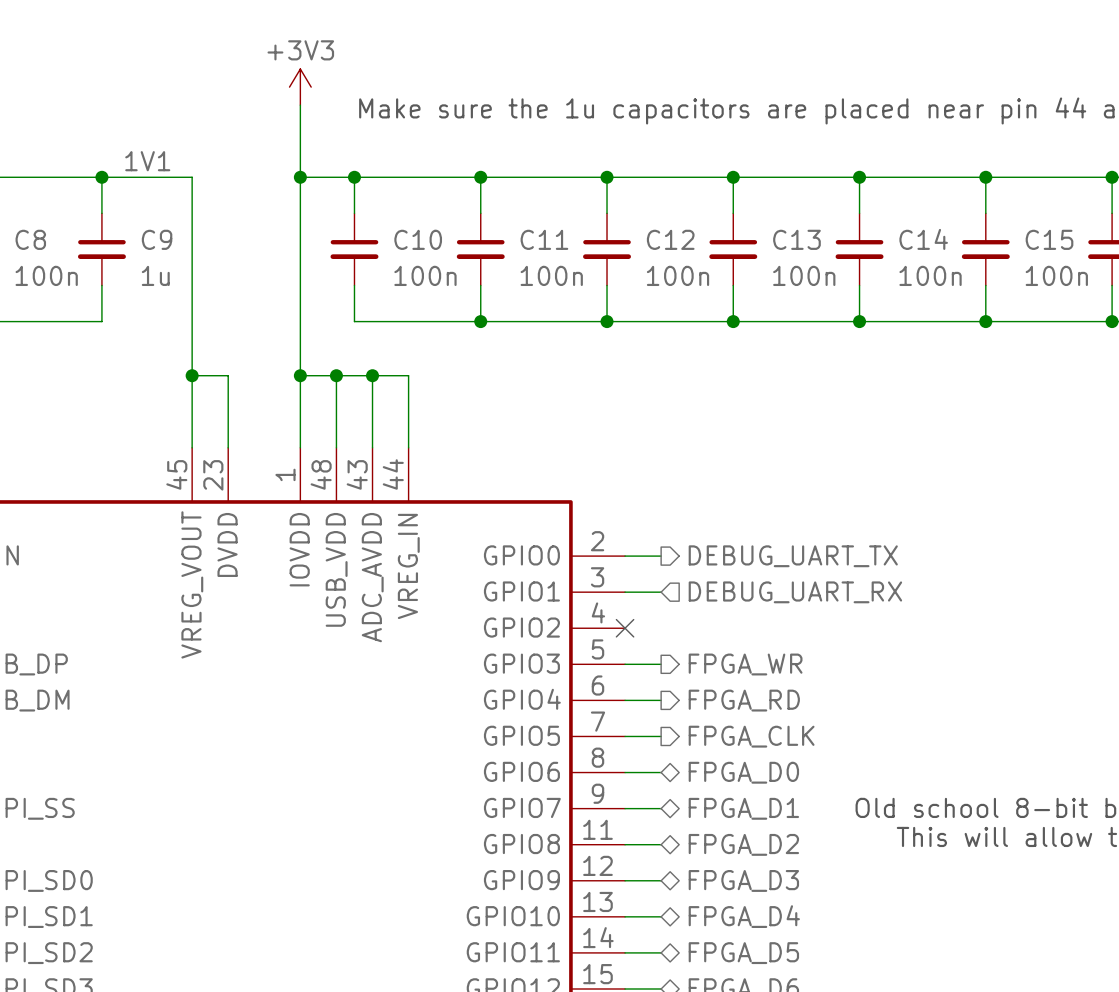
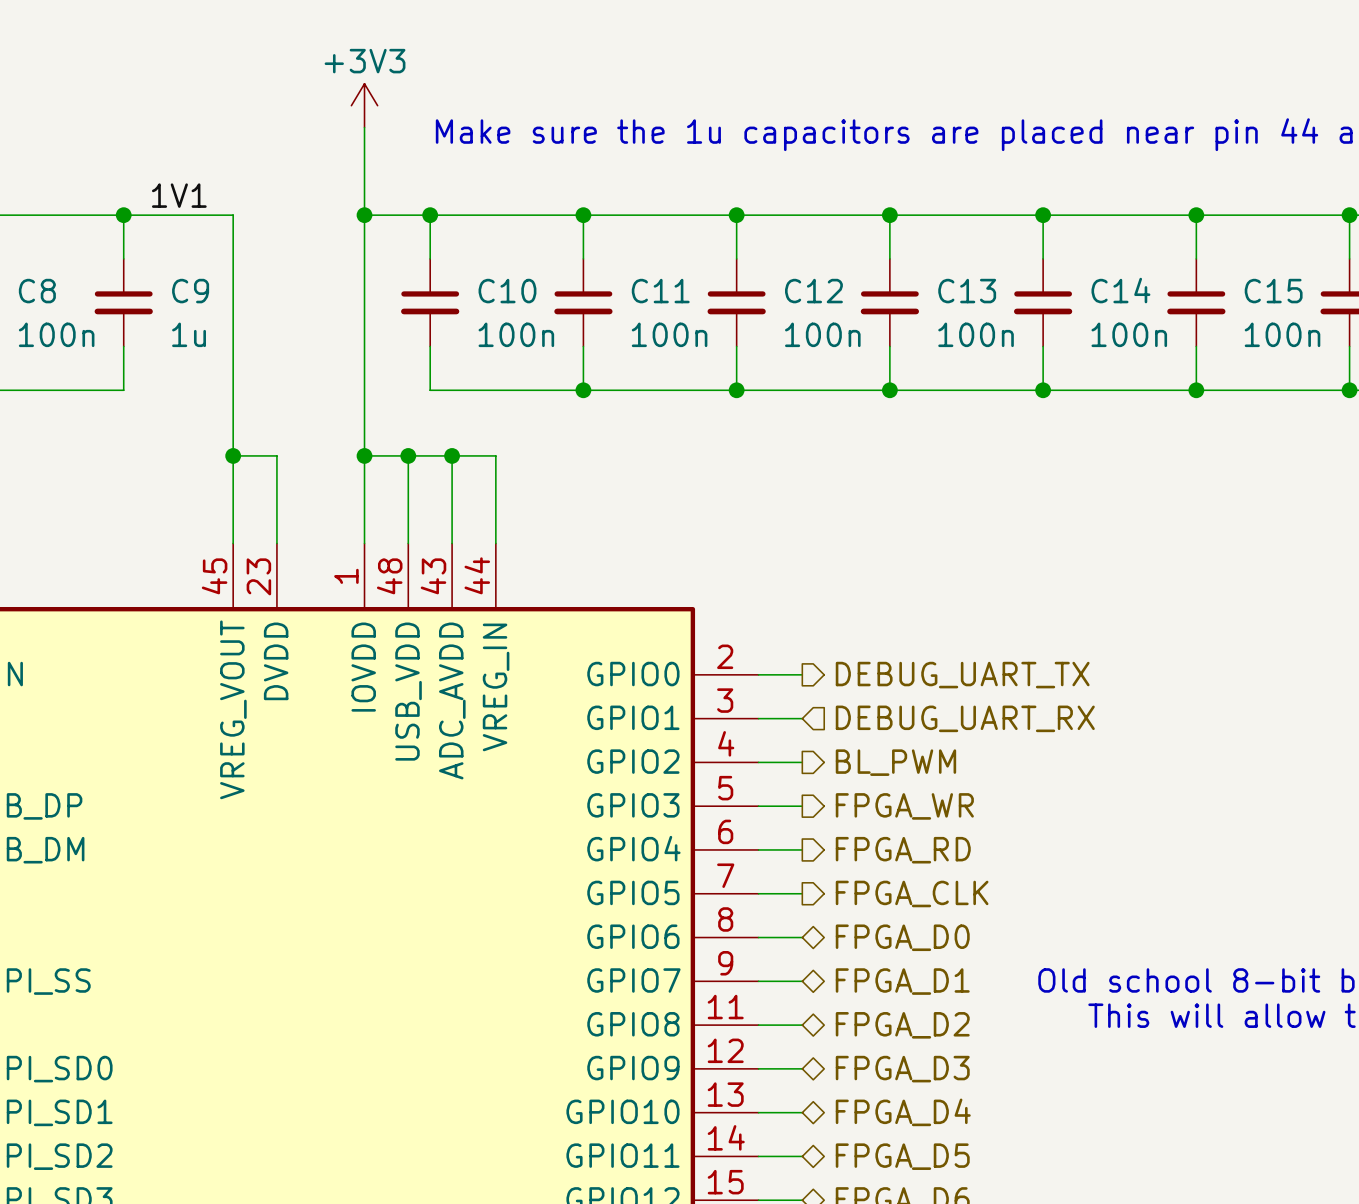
wire: none -> (758, 762) (802, 762)
no-connect mark: (625, 628) -> none
hierarchical label: none -> BL_PWM (895, 762)

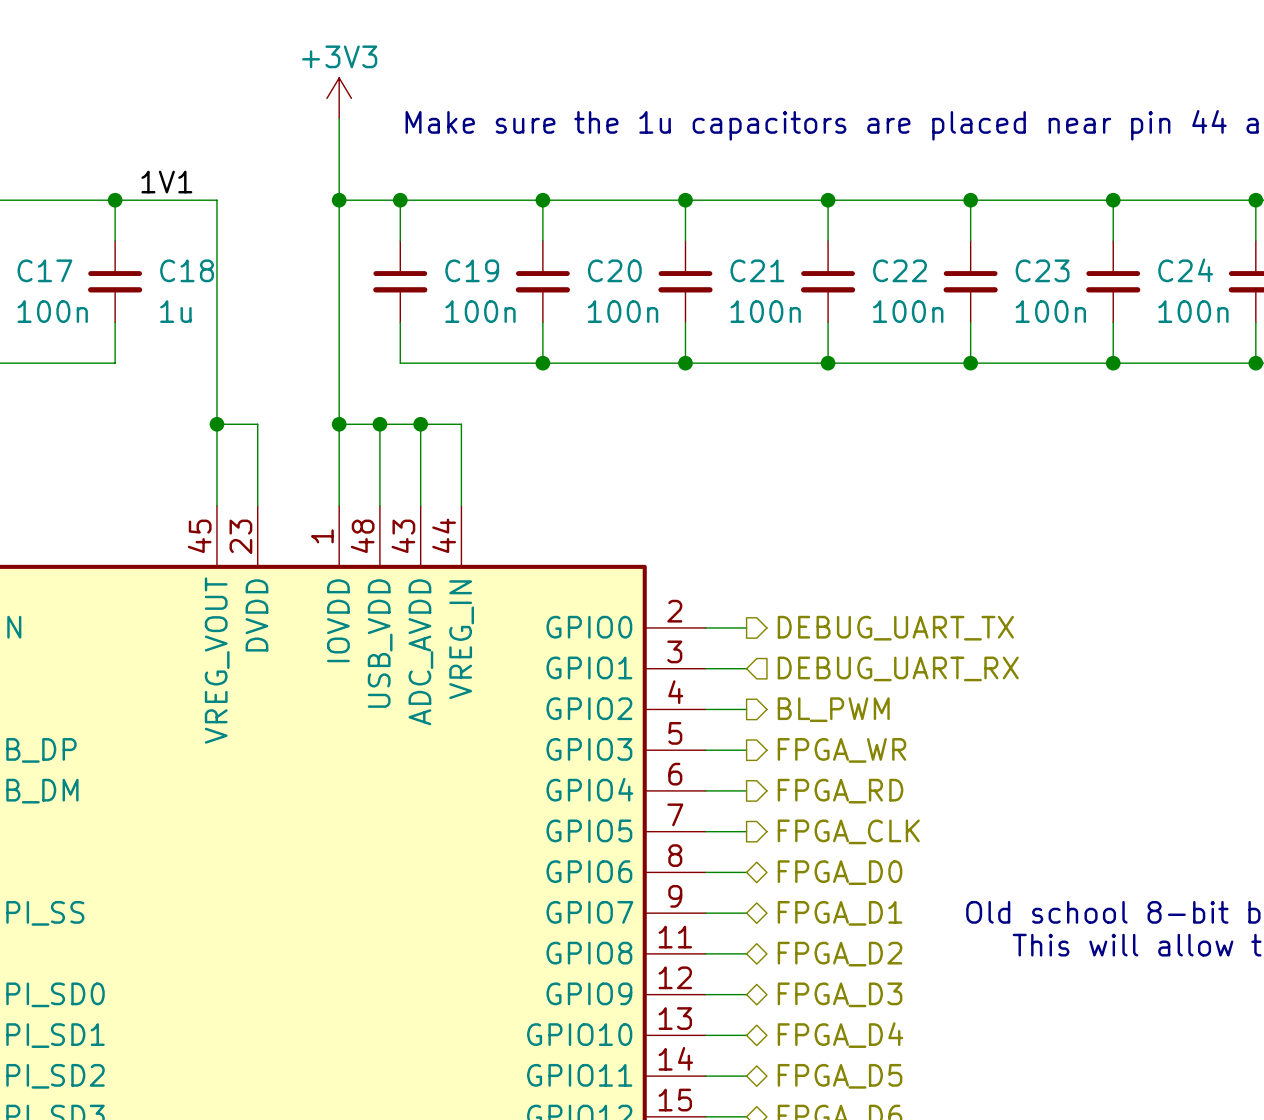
C14 name: C14 (1120, 290) -> C23 (1042, 270)
C8 name: C8 (37, 291) -> C17 (44, 270)
C9 name: C9 (190, 291) -> C18 (187, 270)
C10 name: C10 (507, 291) -> C19 (472, 270)
C11 name: C11 (660, 291) -> C20 (614, 270)
C12 name: C12 (813, 291) -> C21 (757, 270)
C13 name: C13 (967, 291) -> C22 (899, 270)
C15 name: C15 (1273, 291) -> C24 (1185, 270)

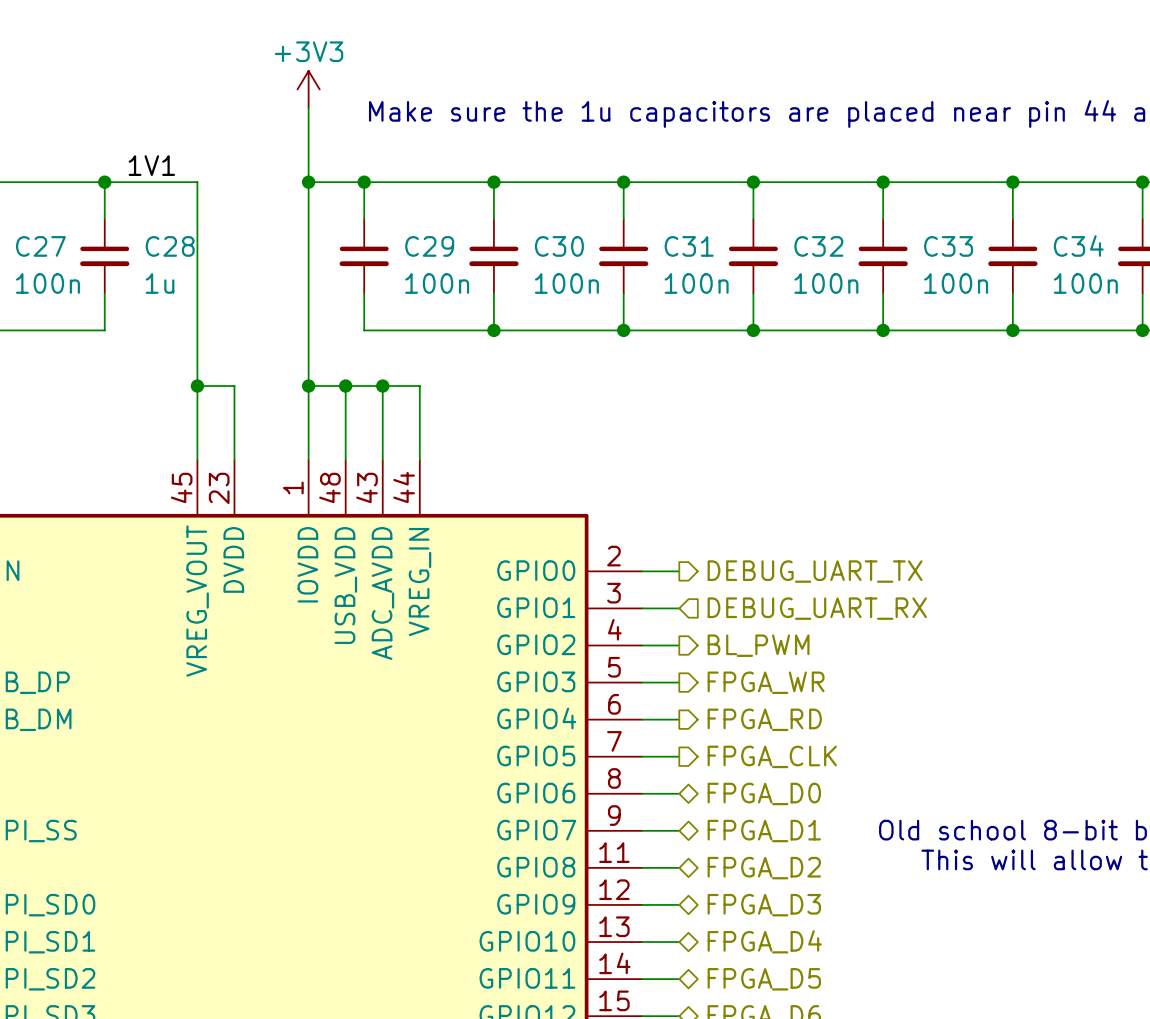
C17 name: C17 (44, 270) -> C27 (40, 246)
C18 name: C18 (187, 270) -> C28 (170, 246)
C19 name: C19 (472, 270) -> C29 (429, 246)
C20 name: C20 (614, 270) -> C30 (559, 246)
C21 name: C21 (757, 270) -> C31 (689, 246)
C22 name: C22 (899, 270) -> C32 (818, 246)
C23 name: C23 (1042, 270) -> C33 (948, 246)
C24 name: C24 (1185, 270) -> C34 (1078, 245)

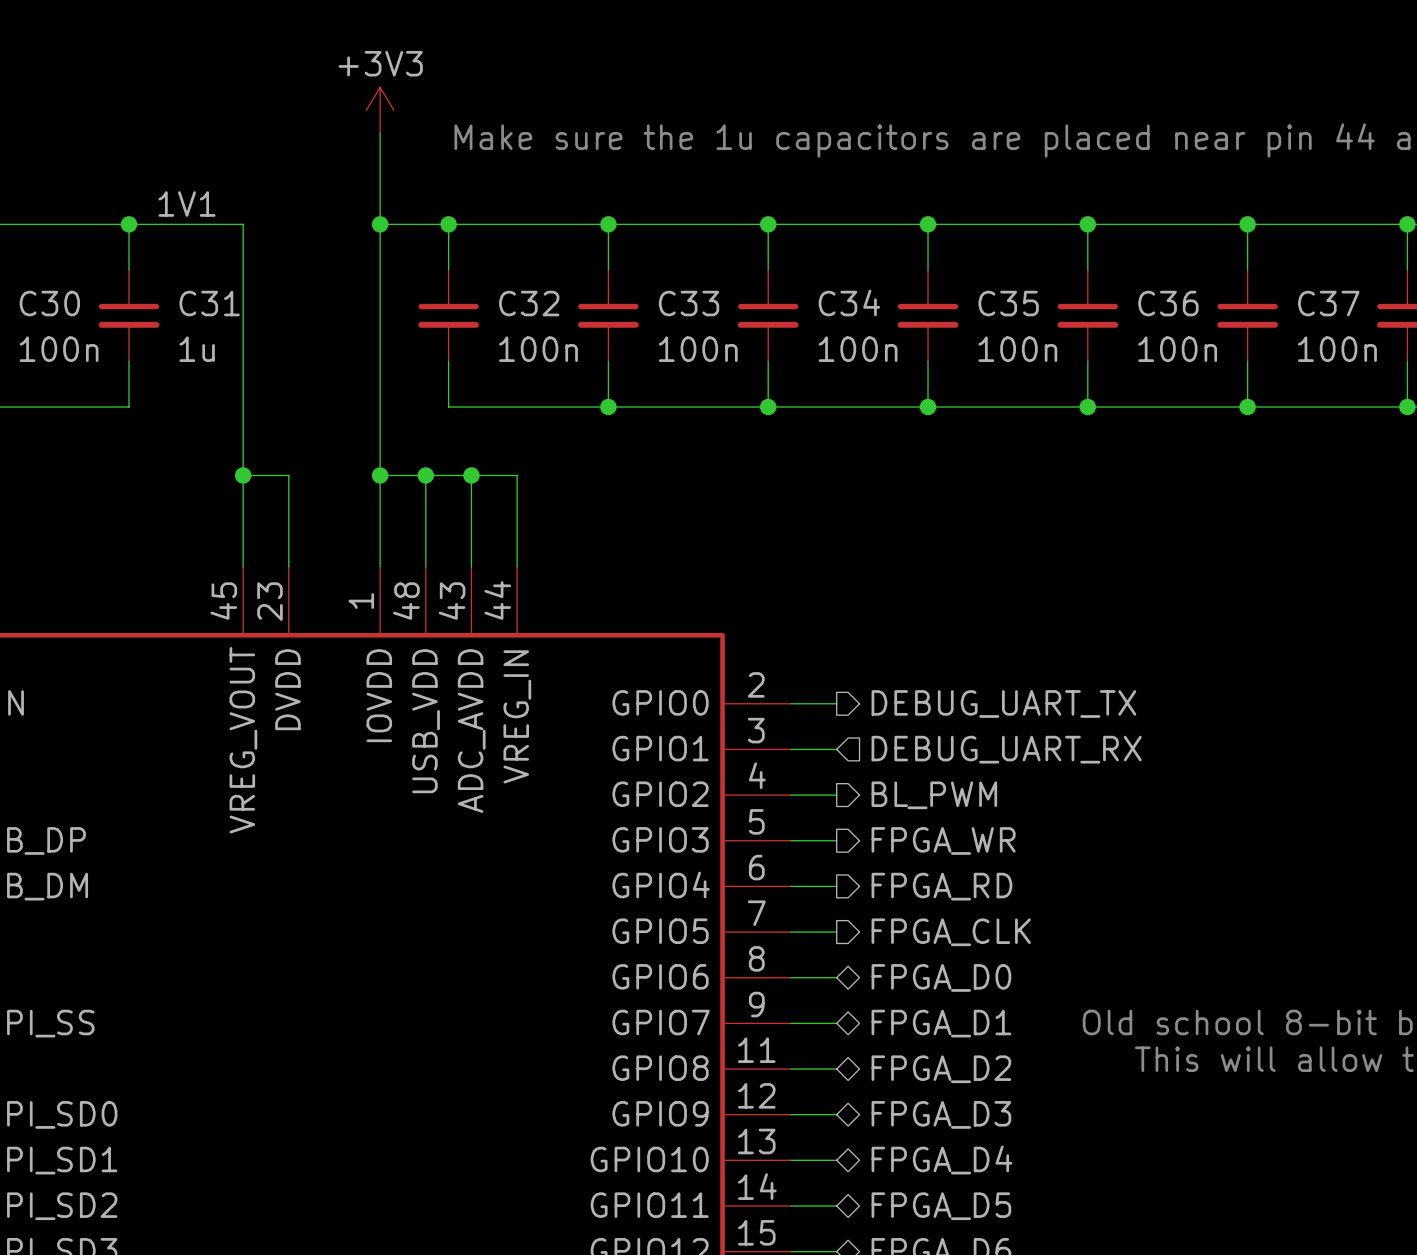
C34 name: C34 (1078, 245) -> C37 (1328, 303)
C27 name: C27 (40, 246) -> C30 (49, 303)
C28 name: C28 (170, 246) -> C31 (209, 303)
C29 name: C29 (429, 246) -> C32 (529, 303)
C30 name: C30 (559, 246) -> C33 (689, 303)
C31 name: C31 (689, 246) -> C34 (849, 302)
C32 name: C32 (818, 246) -> C35 (1008, 303)
C33 name: C33 (948, 246) -> C36 (1168, 303)

